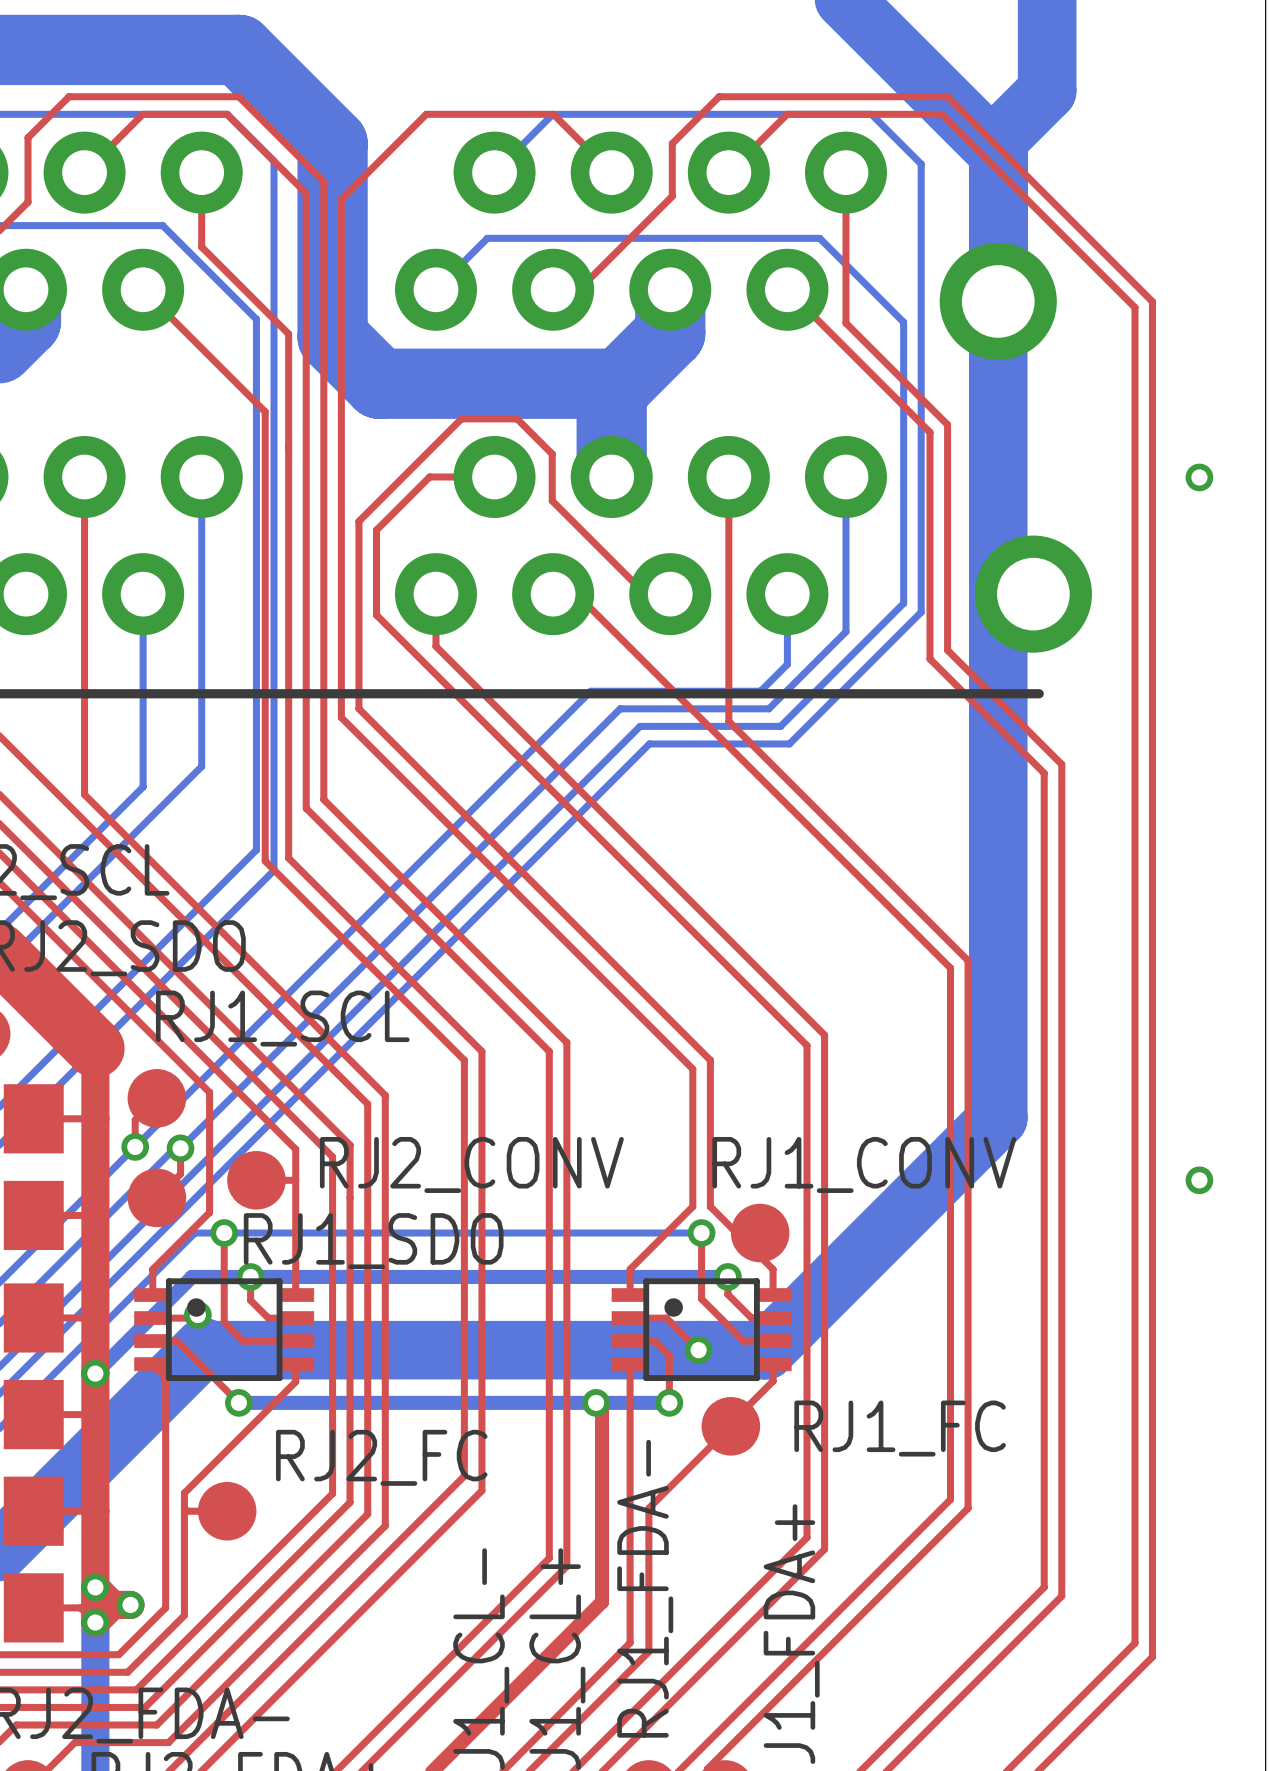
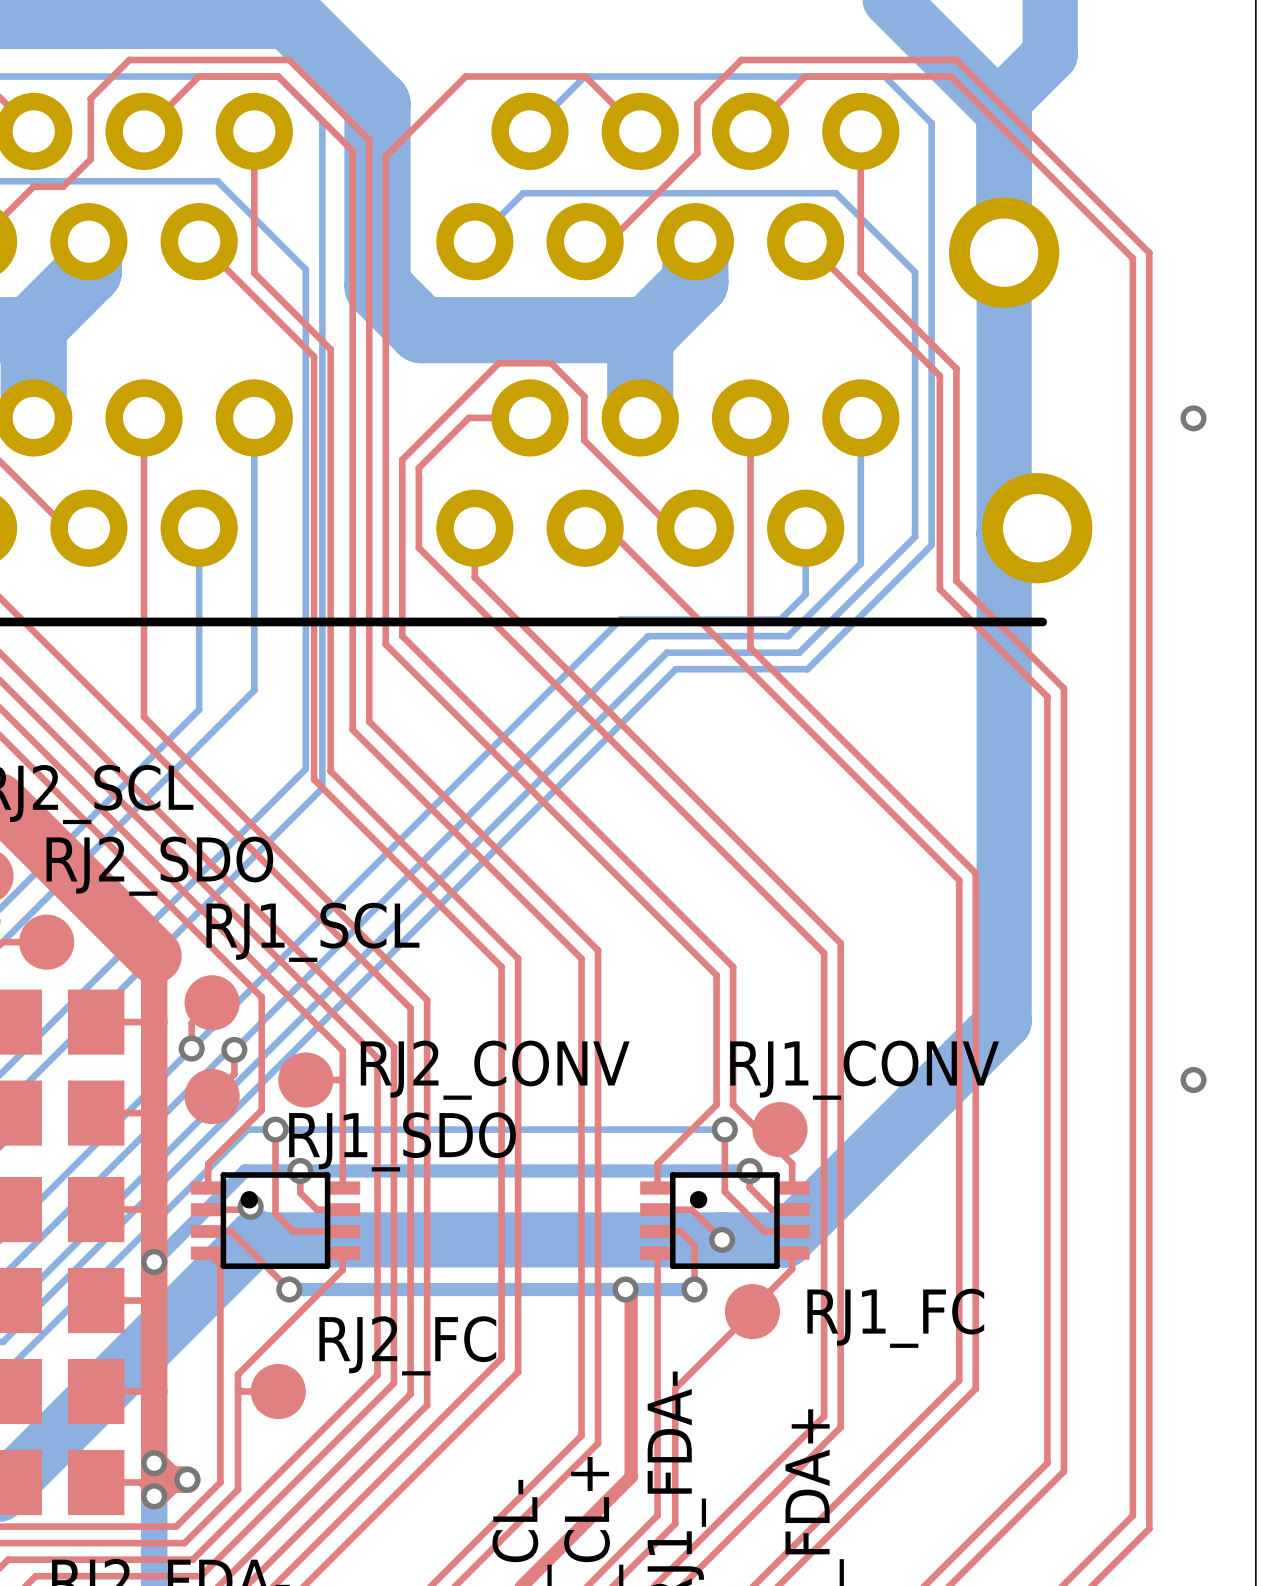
top track: (201, 247) (288, 333) (288, 858) -> (254, 201) (254, 273) (330, 349) (330, 771) (336, 776)

